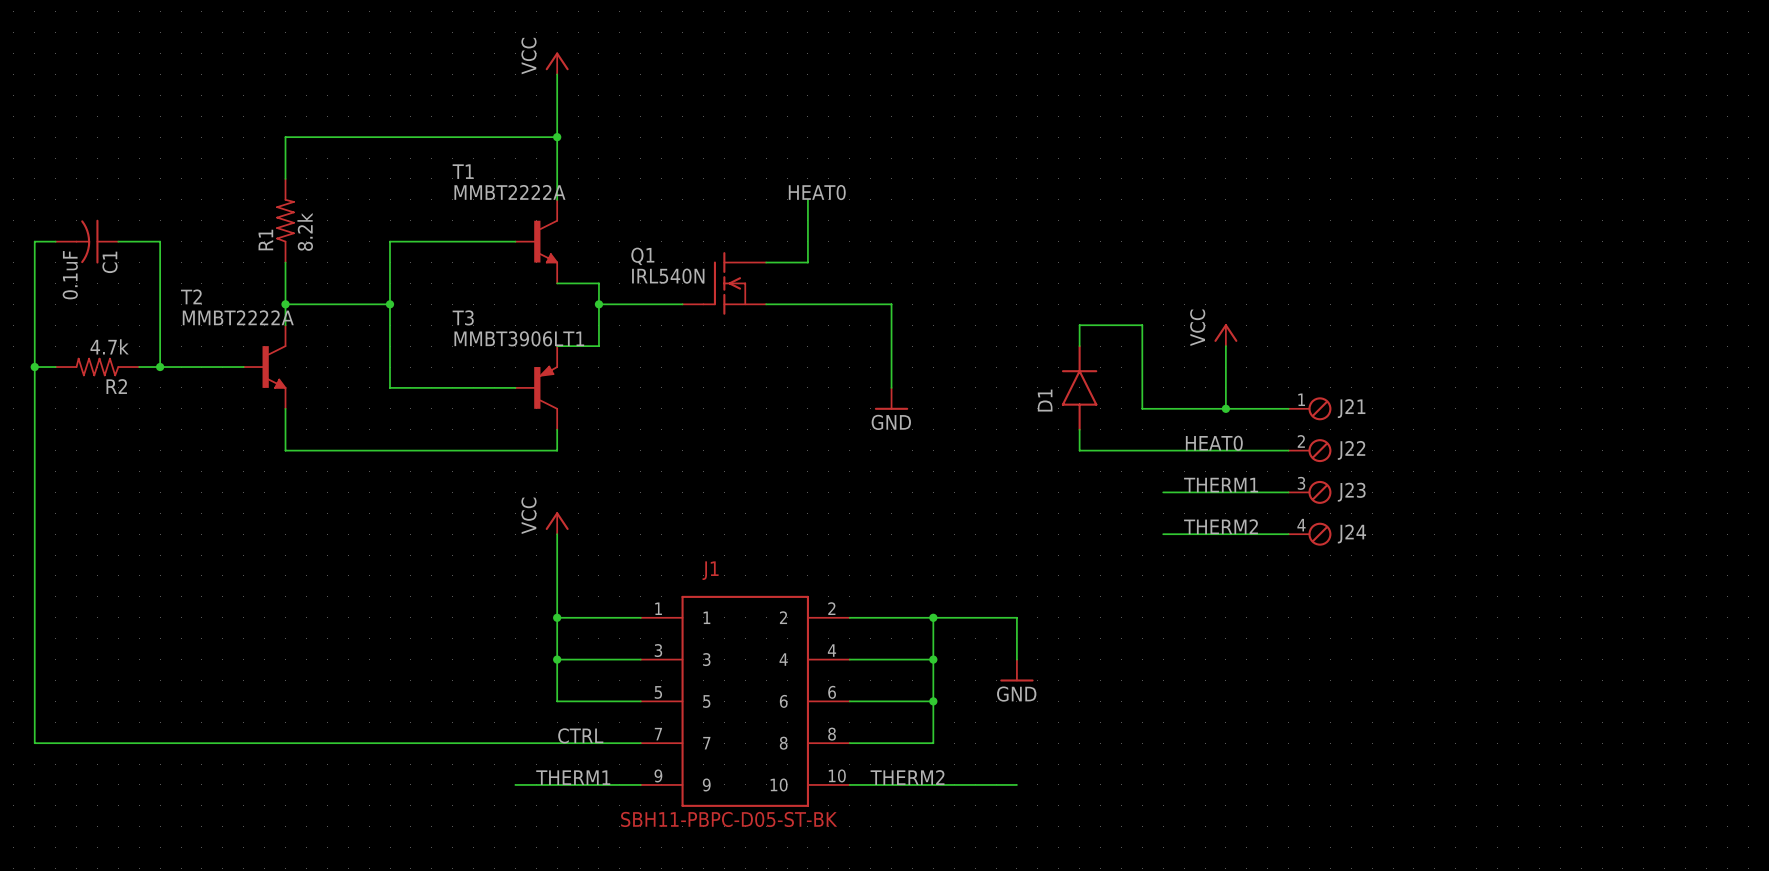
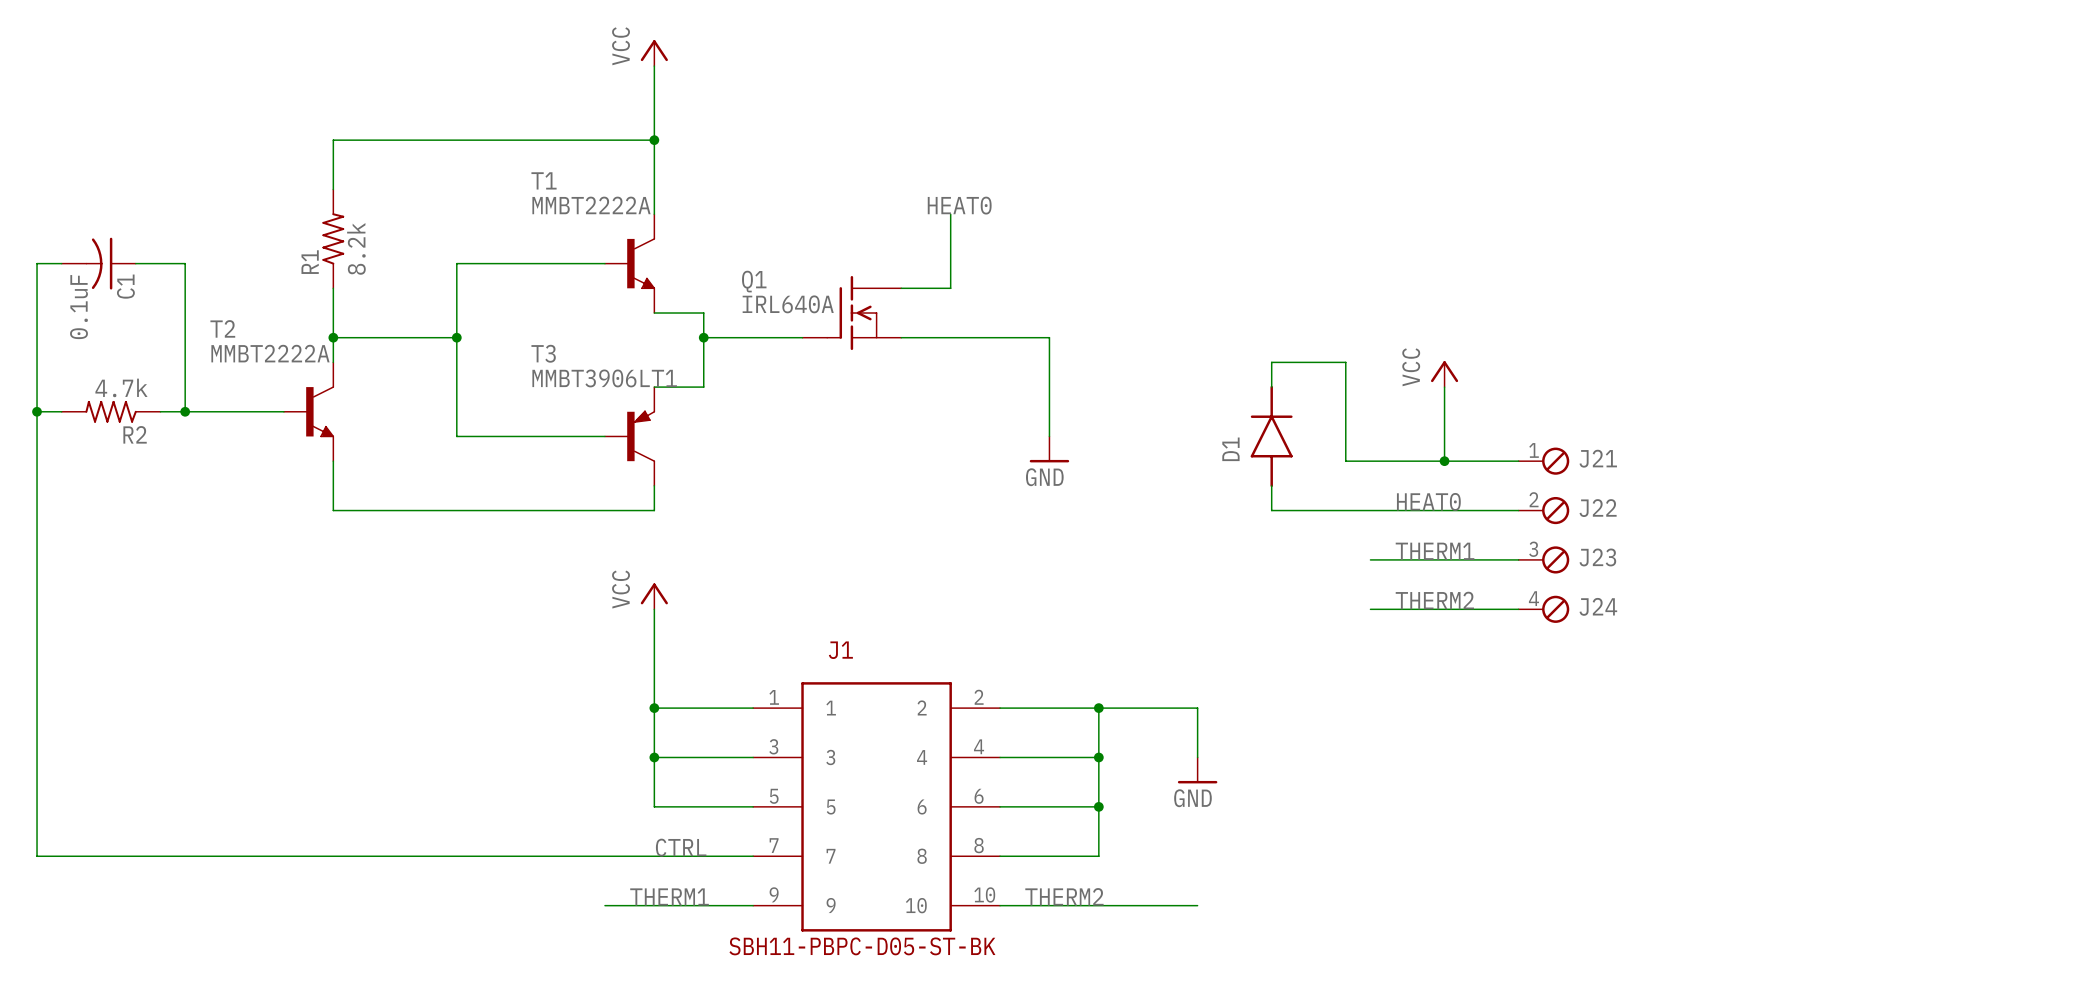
Q1 value: IRL540N (668, 276) -> IRL640A (788, 304)

